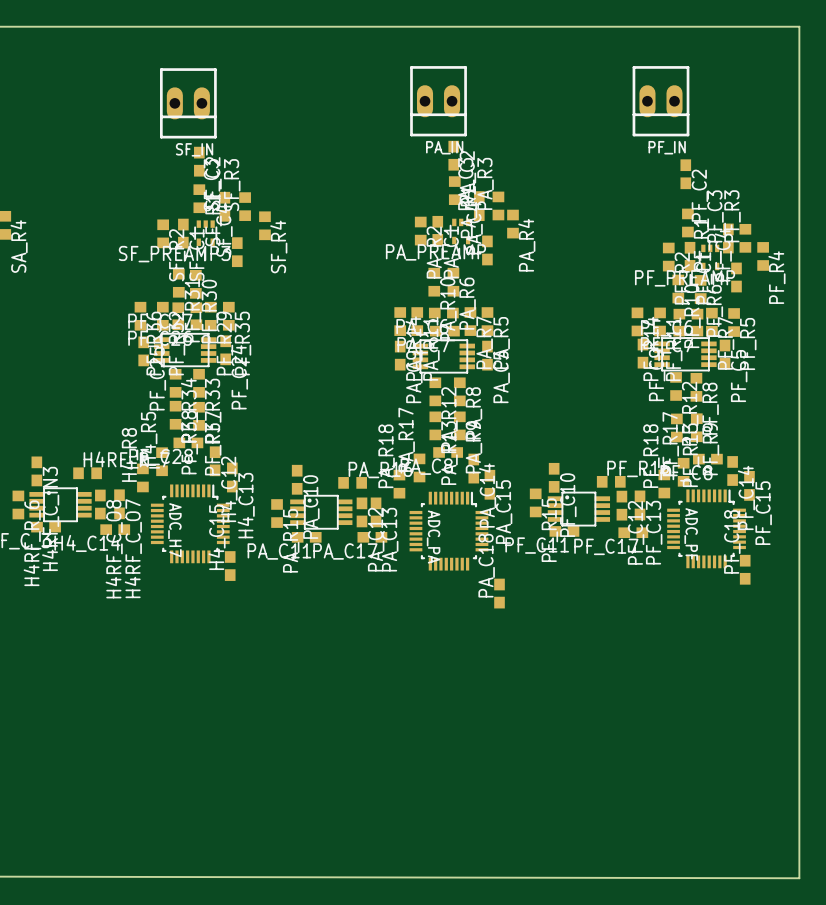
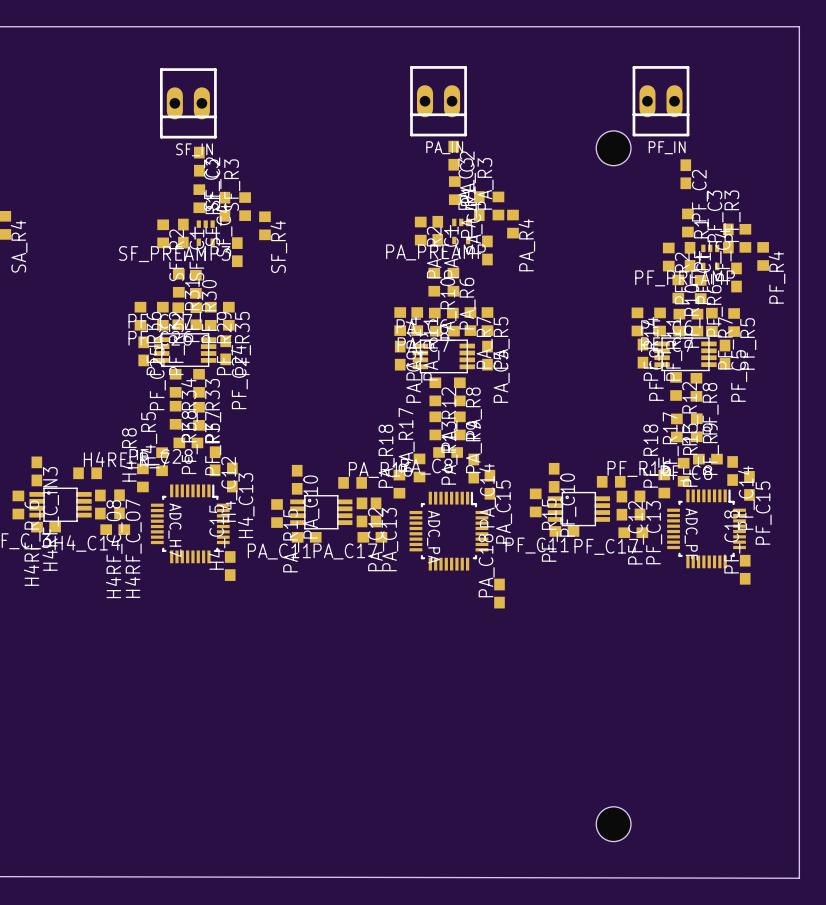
hole: none -> (613, 148)
hole: none -> (613, 824)

